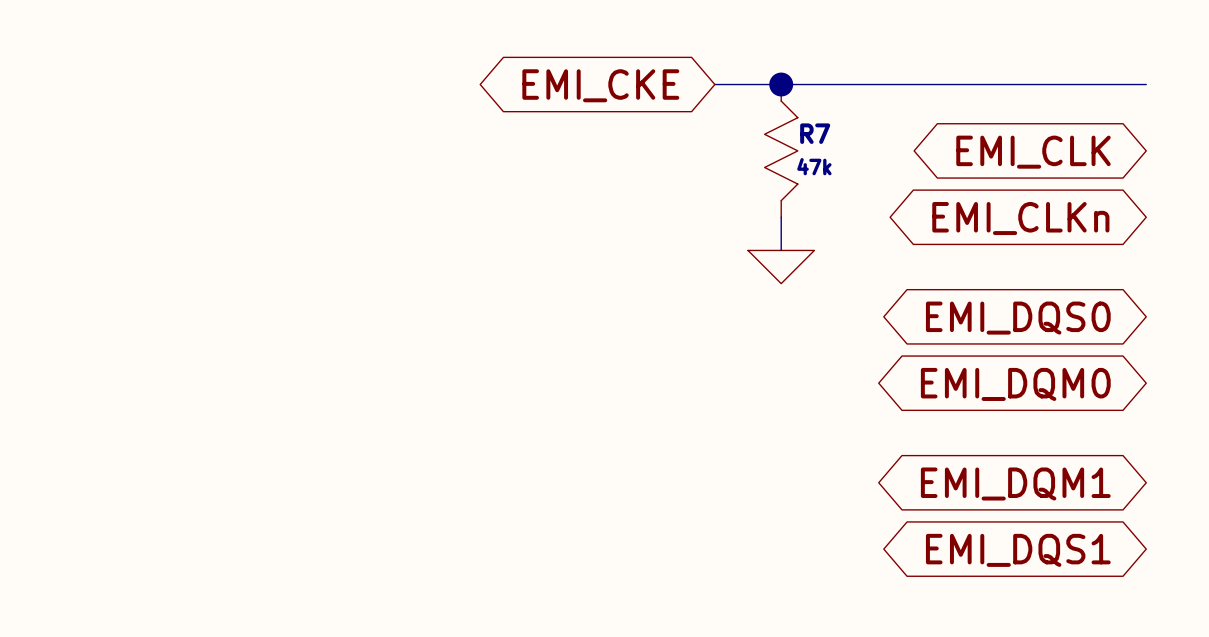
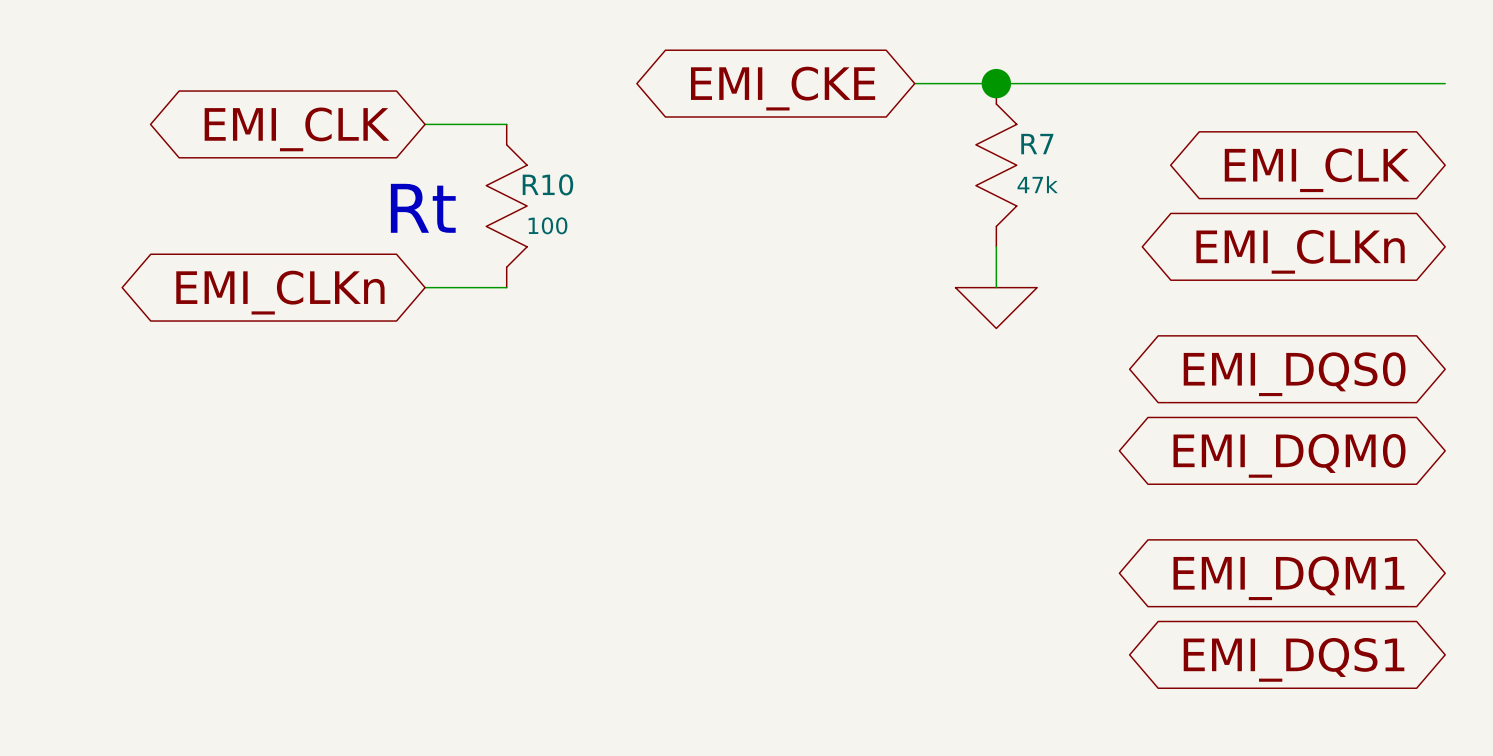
wire: none -> (425, 124) (506, 124)
global label: none -> EMI_CLK (296, 129)
R10: none -> 100 (506, 206)
text: none -> Rt (423, 208)
wire: none -> (425, 287) (506, 287)
global label: none -> EMI_CLKn (280, 292)

